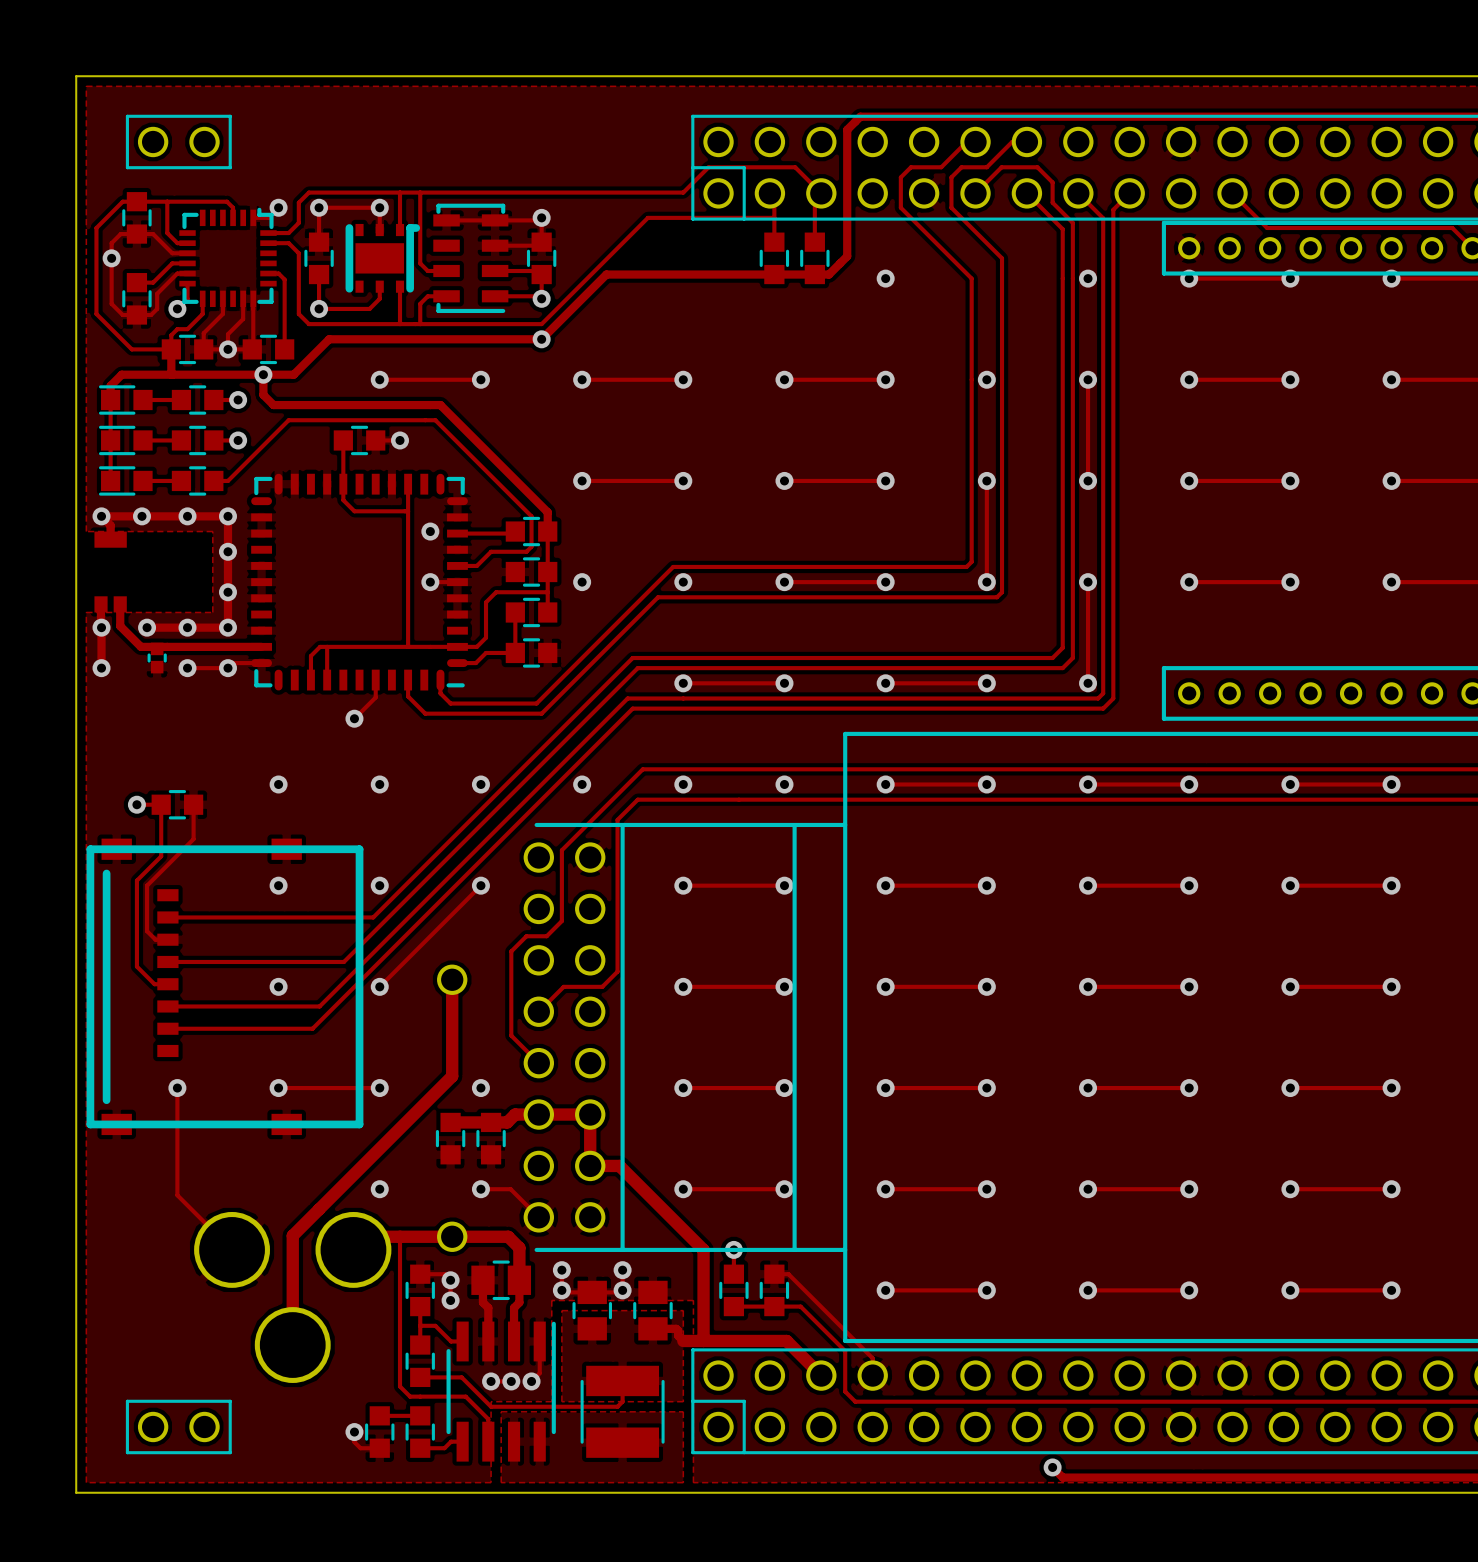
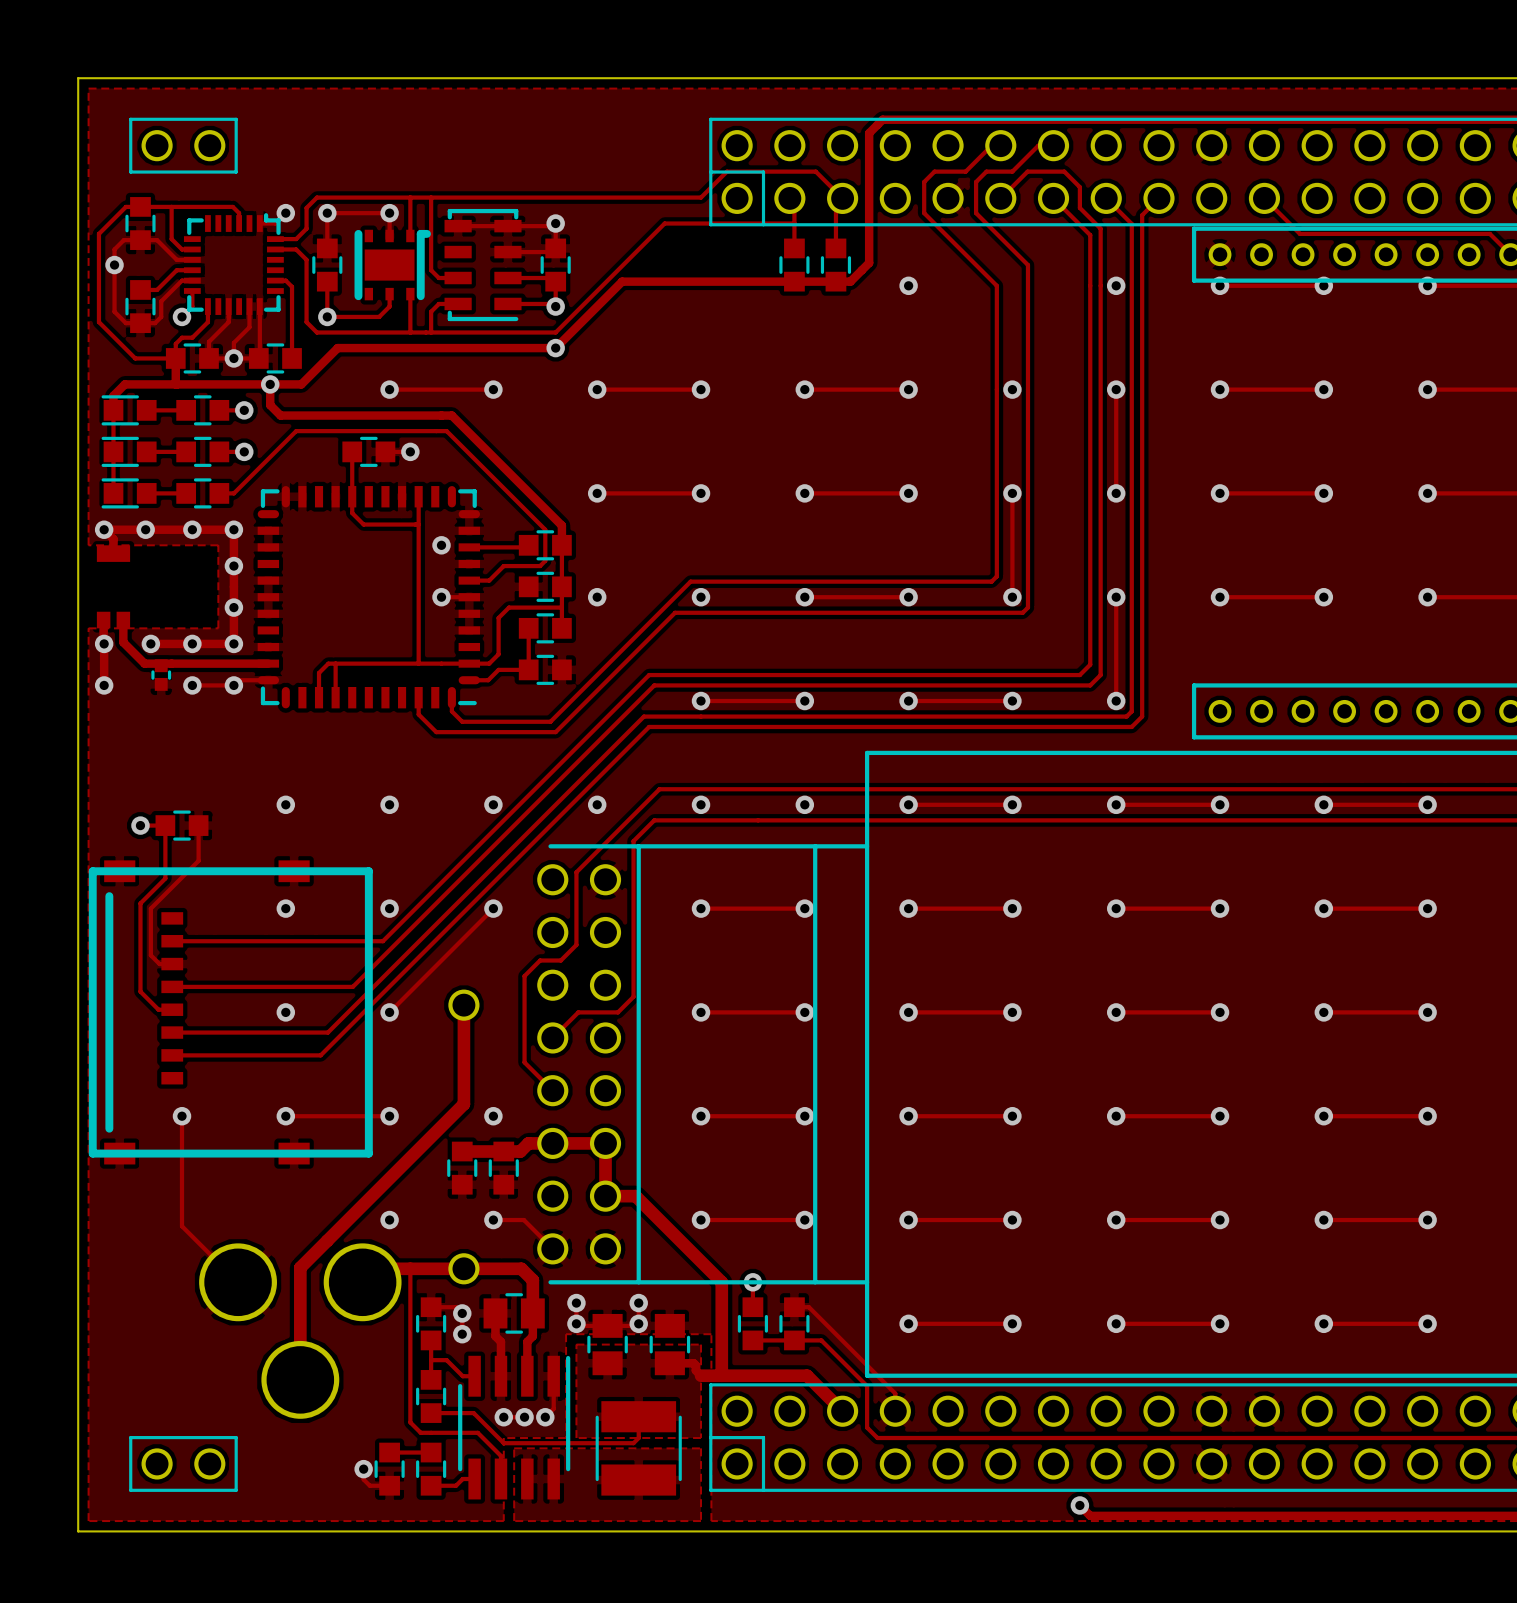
track: (375, 680) (375, 697) (354, 718) -> none
via: (354, 718) -> none

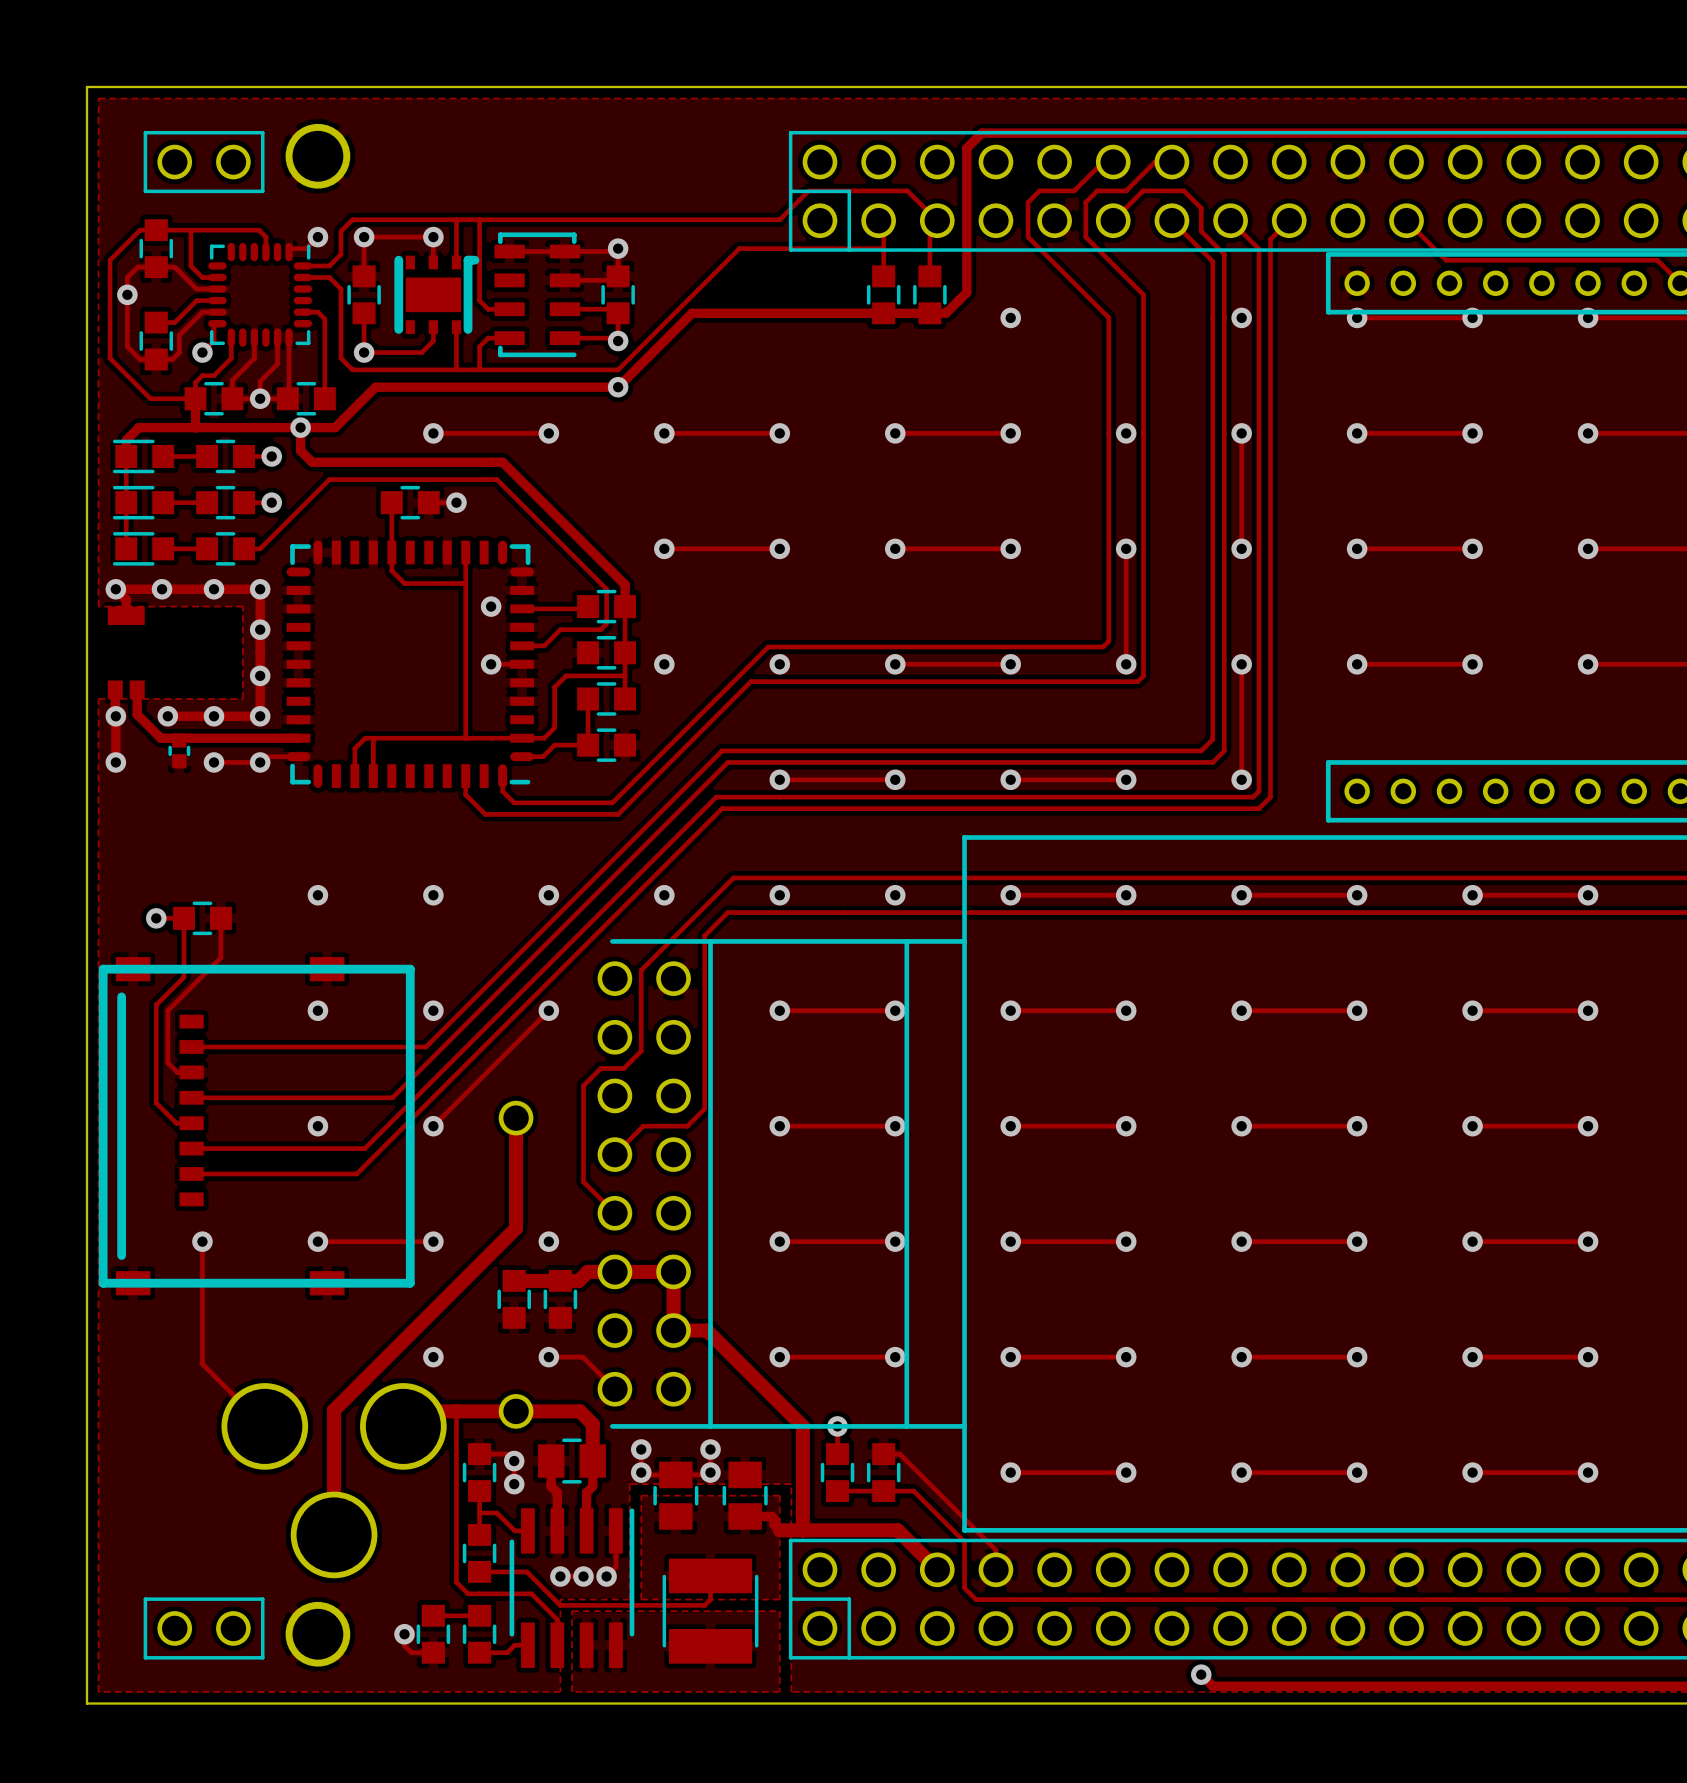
part: none -> (317, 156)
part footprint: [183, 213, 284, 315] -> [208, 242, 313, 347]
part: none -> (317, 1634)

